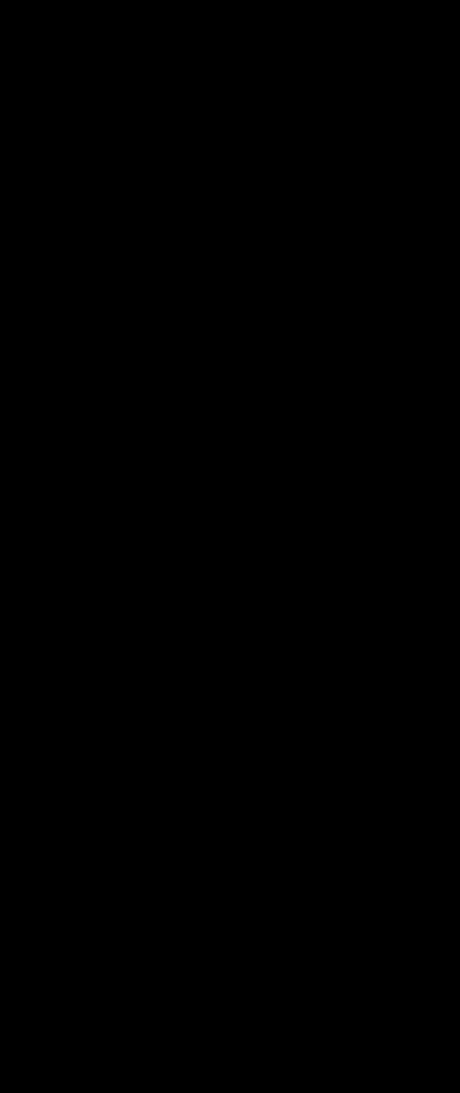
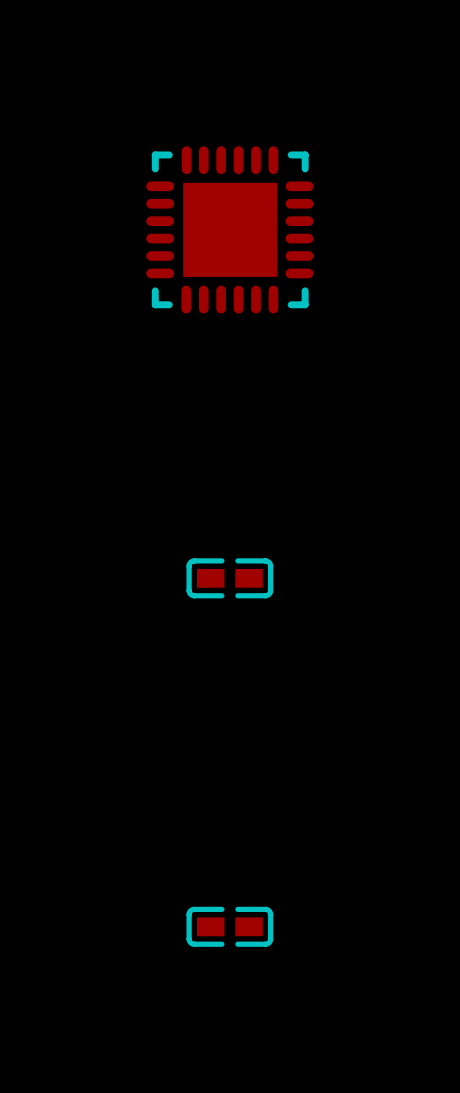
part: none -> (229, 229)
part: none -> (229, 578)
part: none -> (229, 926)

